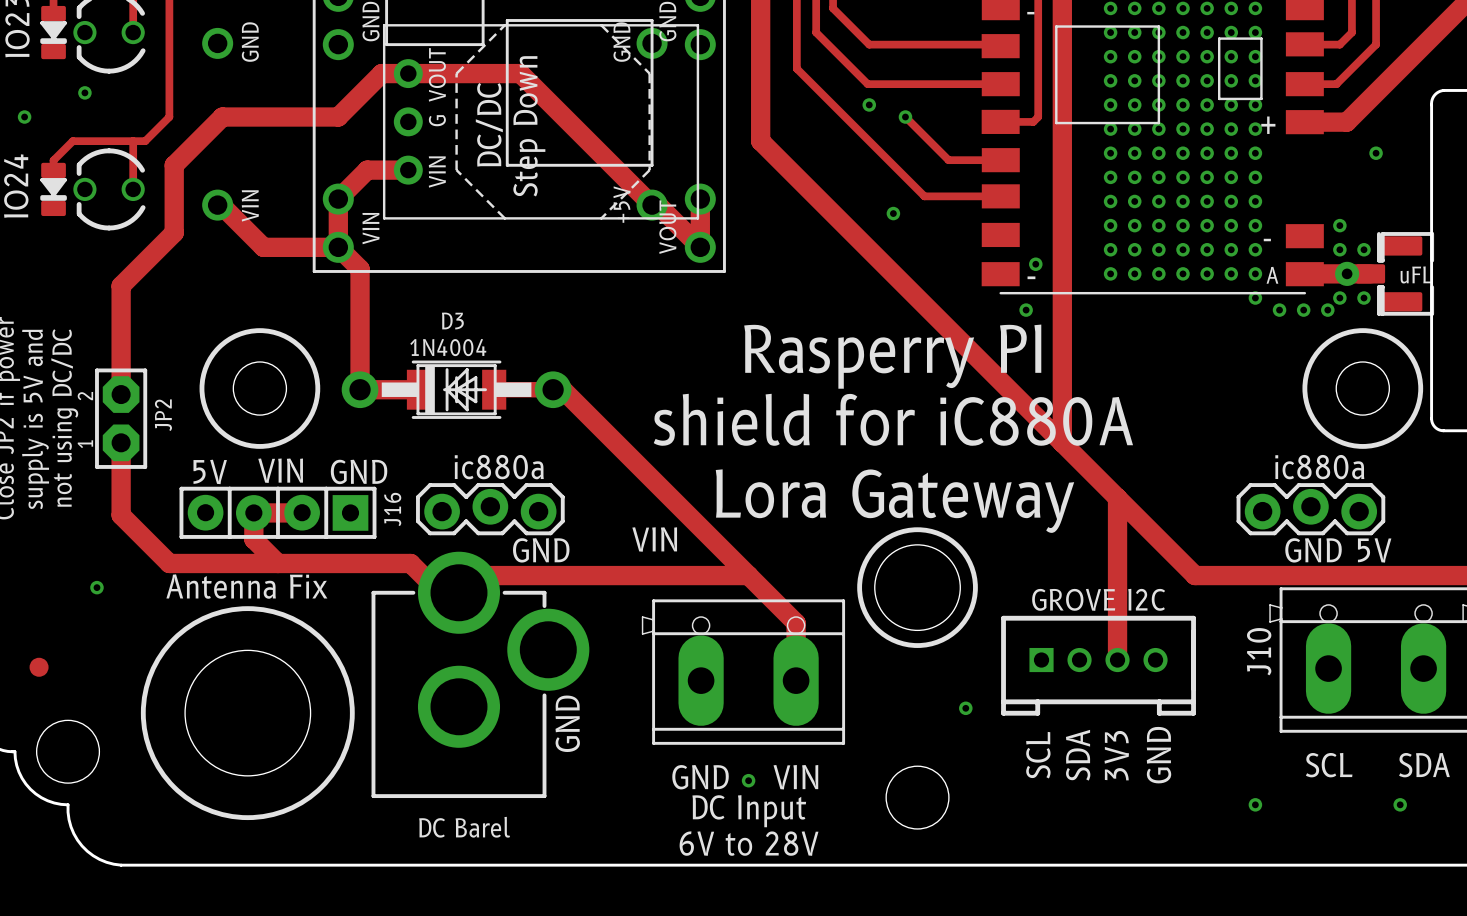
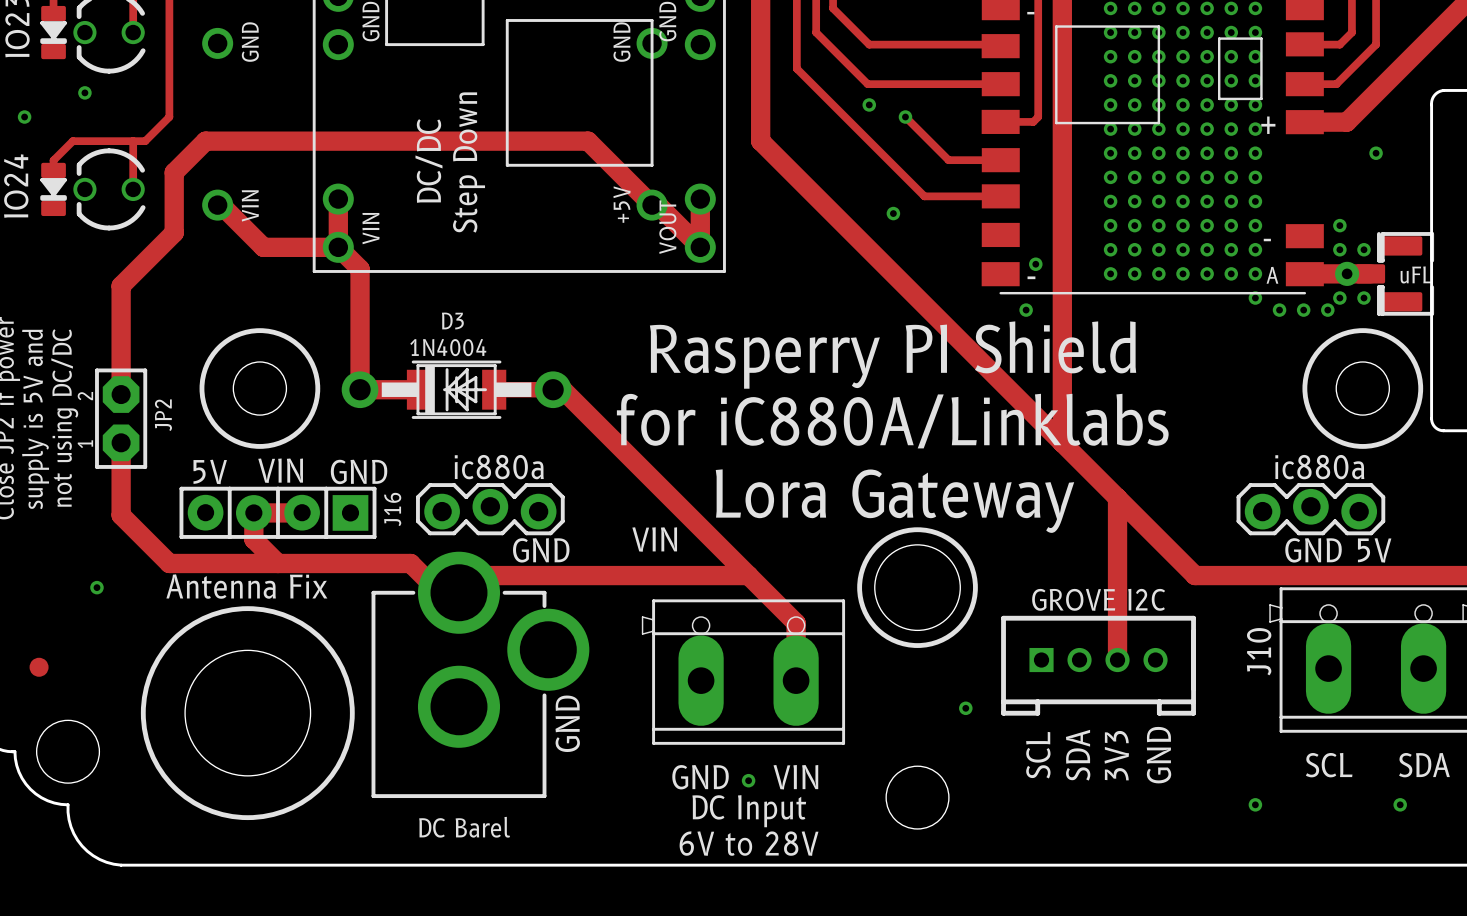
text: VOUT (437, 74) -> none
text: G (437, 120) -> none
part: (541, 121) -> none
text: DC/DC (489, 124) -> none
text position: Step Down (529, 126) -> Step Down (469, 162)
track: (588, 141) (520, 73) (381, 73) (338, 117) (222, 117) (174, 165) (174, 172) -> (588, 141) (205, 141) (174, 172)
track: (408, 170) (367, 170) (338, 199) -> none
text: VIN (437, 172) -> DC/DC (428, 161)
text: Rasperry PI (892, 356) -> Rasperry PI Shield (893, 355)
text: shield for iC880A (893, 419) -> for iC880A/Linklabs (892, 421)

